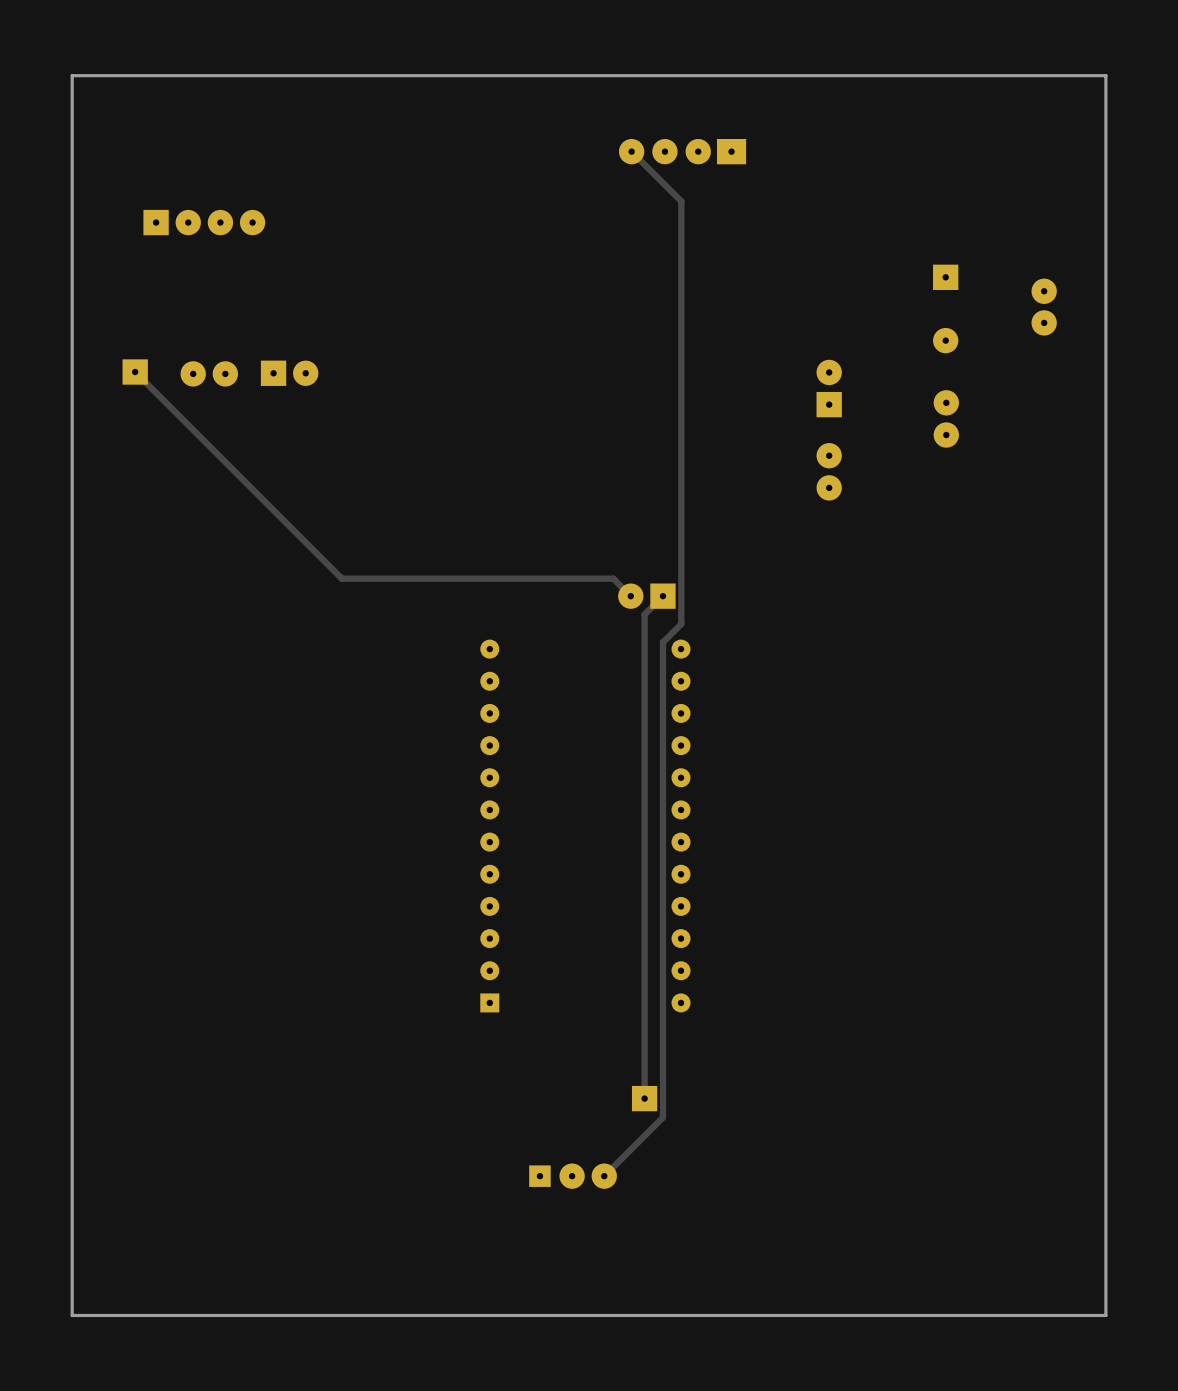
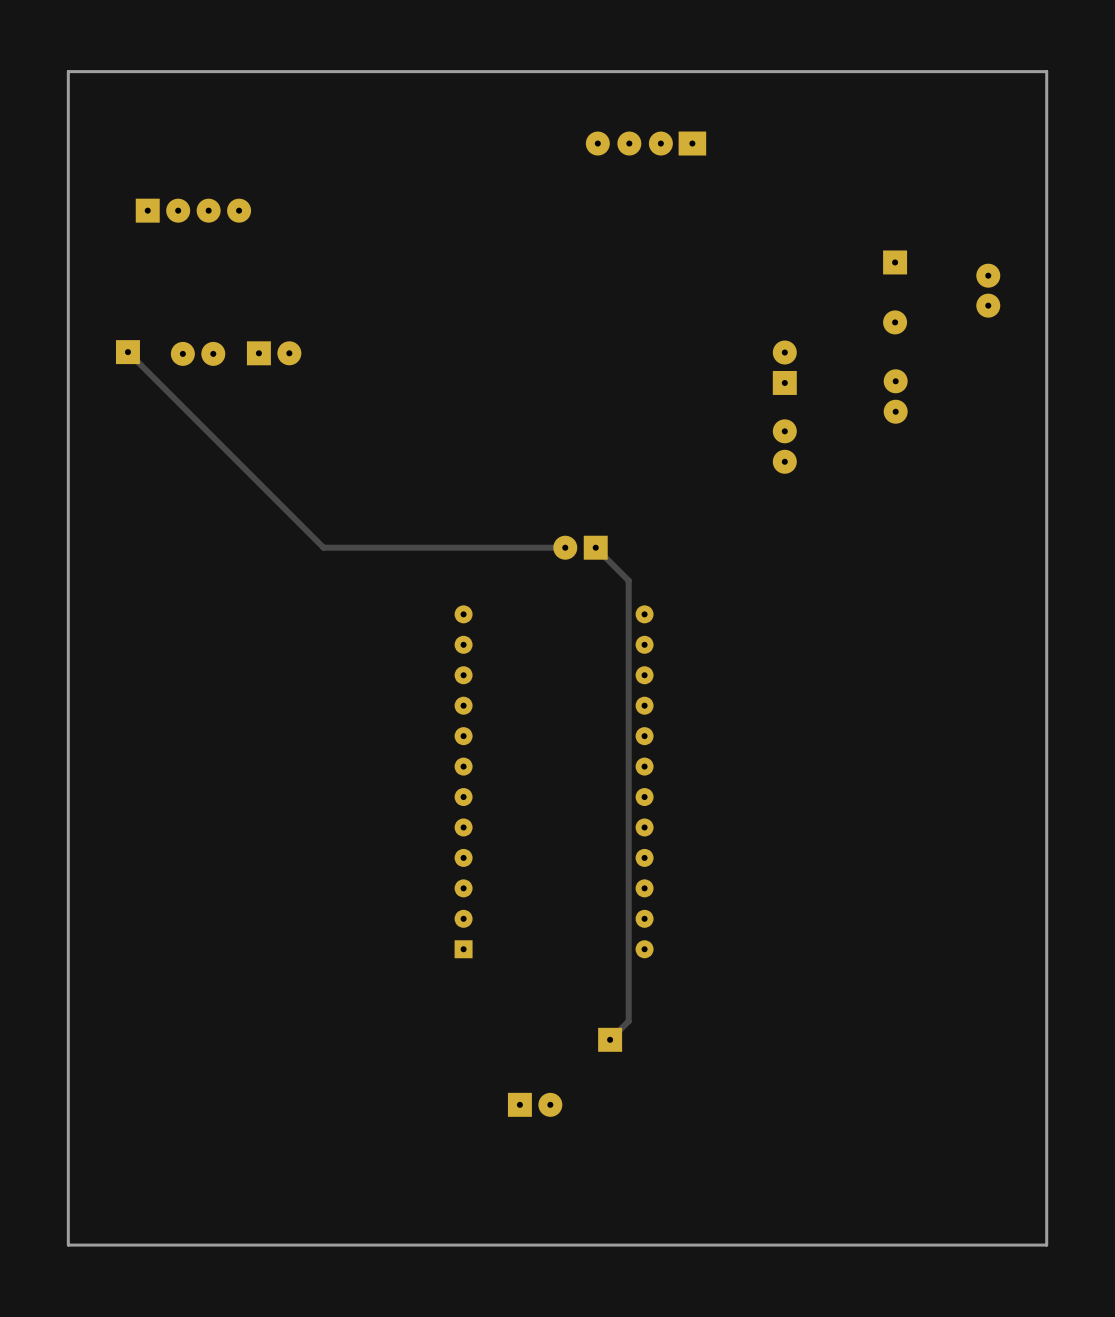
track: (631, 151) (681, 201) (681, 624) (662, 642) (662, 1117) (604, 1176) -> none
track: (597, 578) (613, 578) (630, 596) -> none
part position: (646, 596) -> (580, 547)
track: (662, 596) (644, 614) (644, 1098) -> (595, 547) (628, 580) (628, 1021) (610, 1039)
part footprint: [529, 1163, 617, 1189] -> [507, 1092, 563, 1117]

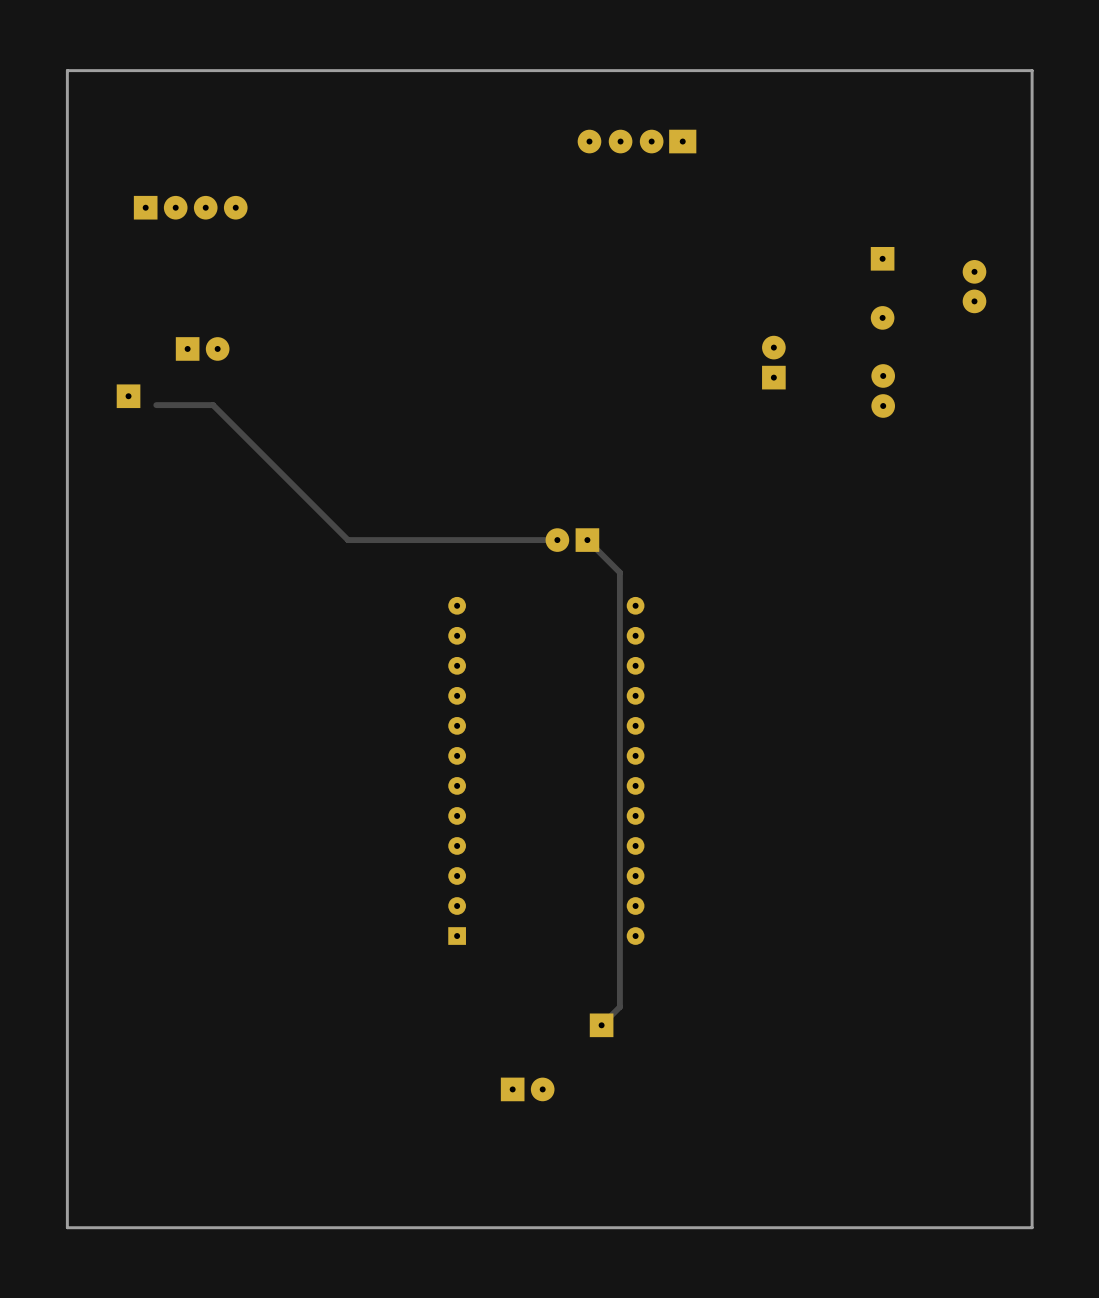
part footprint: [170, 341, 226, 366] -> [175, 337, 230, 361]
track: (127, 352) (323, 547) (352, 547) -> (156, 405) (213, 405) (348, 540)
part position: (127, 352) -> (128, 396)
part: (274, 353) -> none
part: (784, 446) -> none

